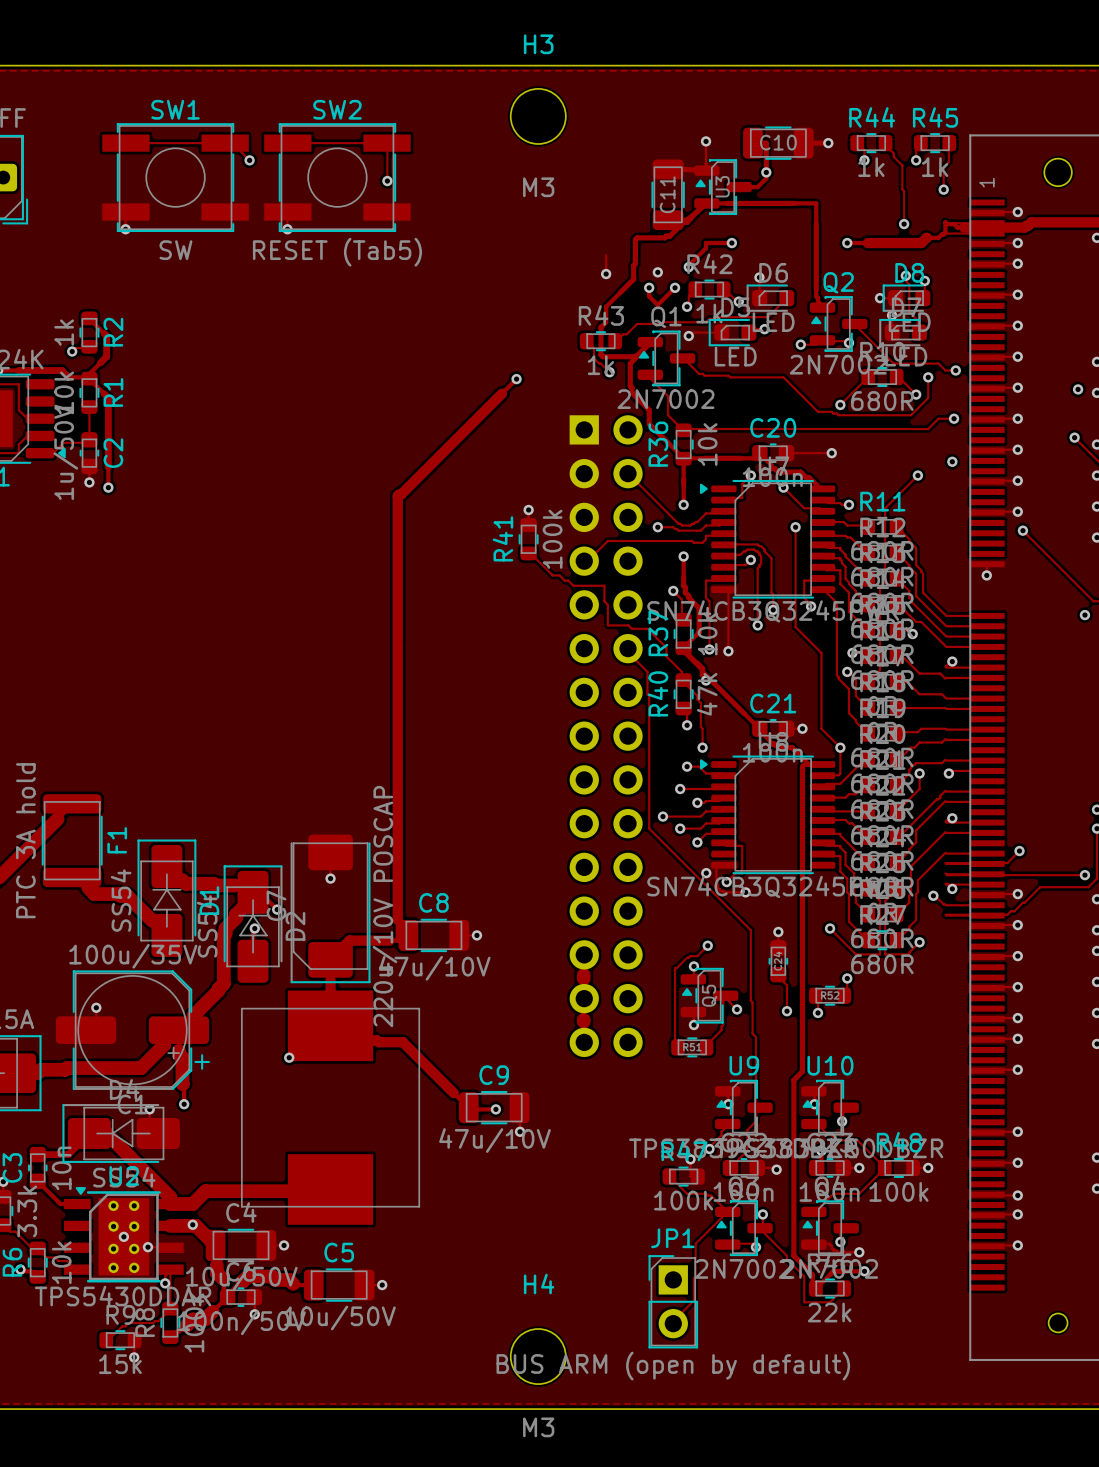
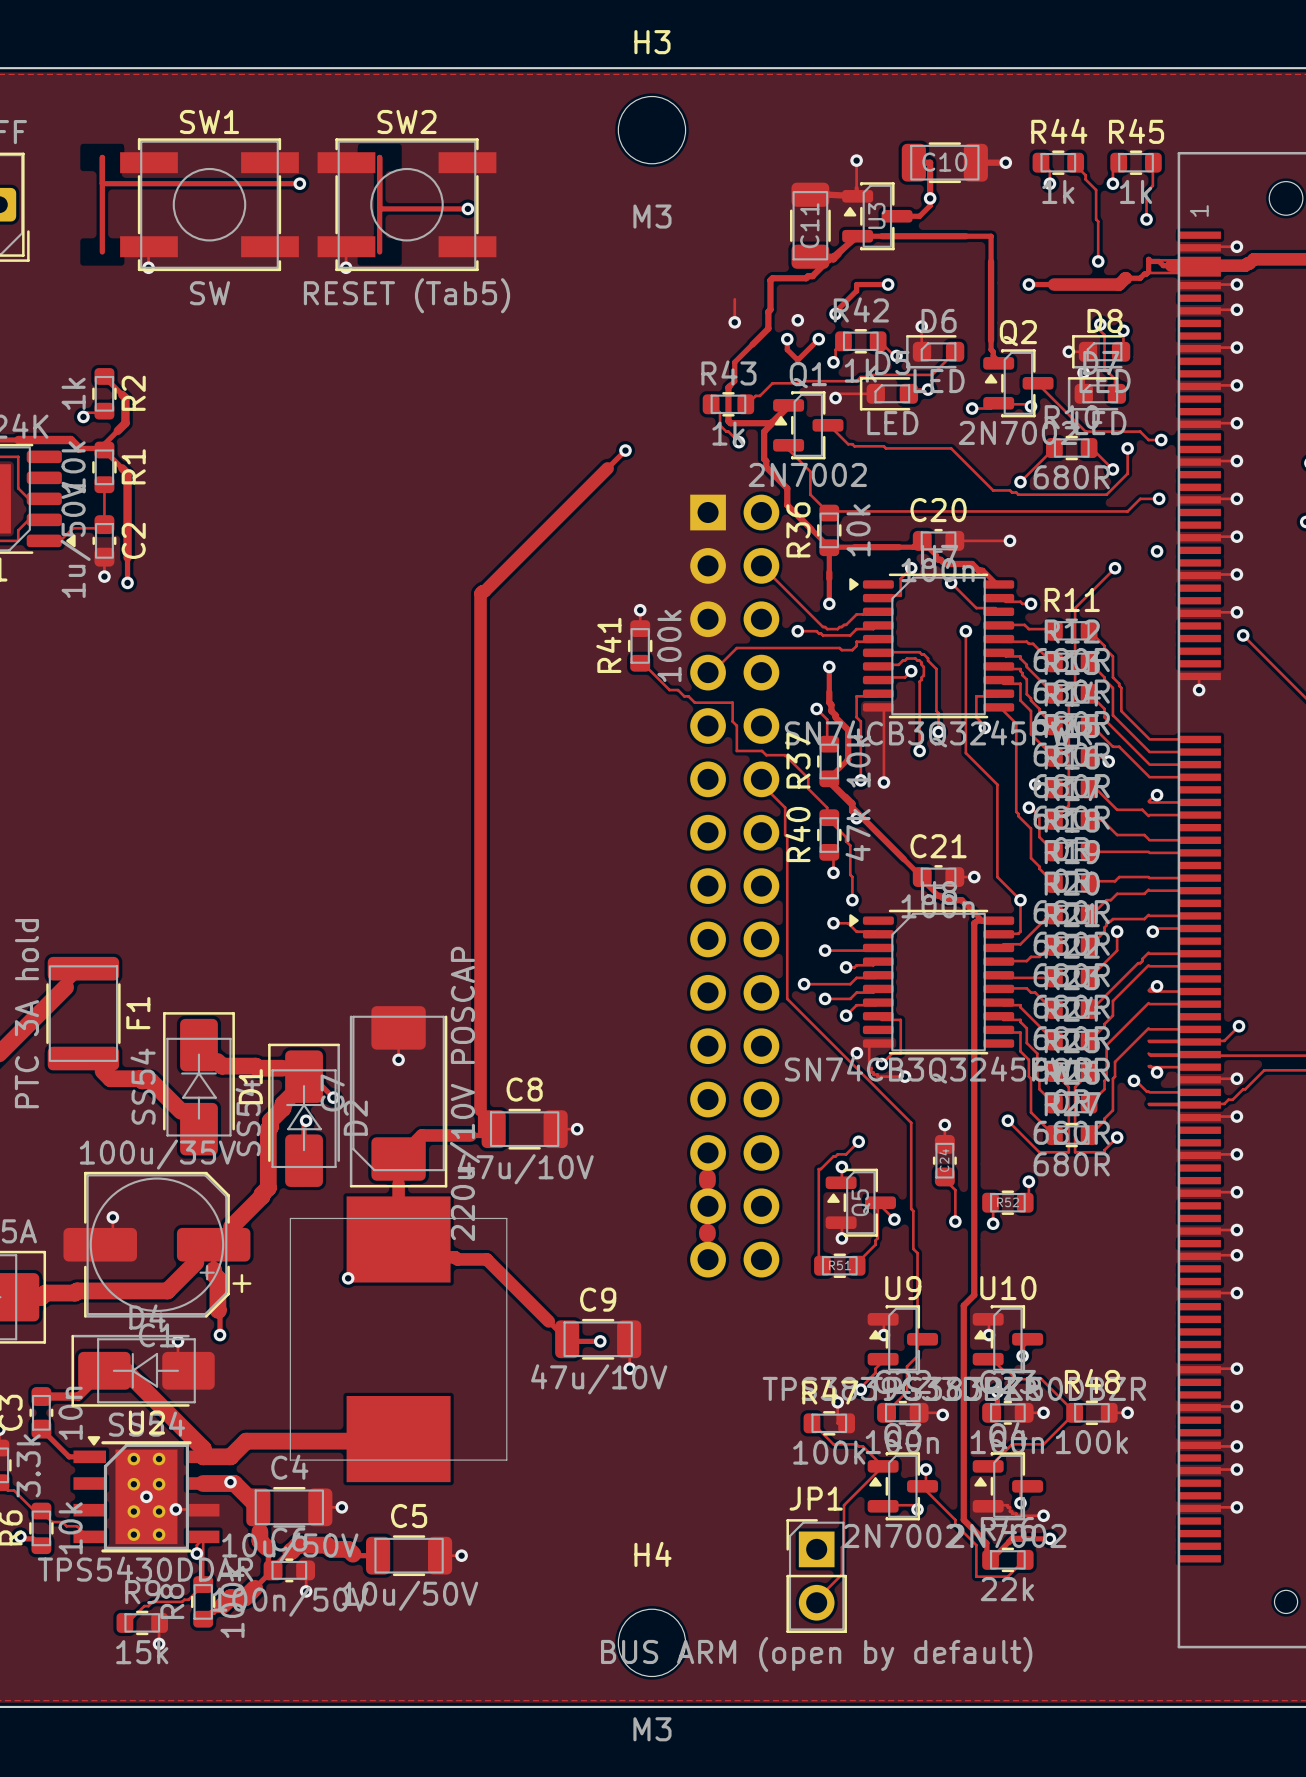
track: none -> (102, 157) (102, 251)
track: none -> (379, 157) (379, 251)
track: (125, 143) (225, 143) (232, 150) (239, 150) (249, 160) -> (102, 183) (299, 183)
track: (287, 143) (387, 143) (387, 181) -> (379, 208) (467, 208)

